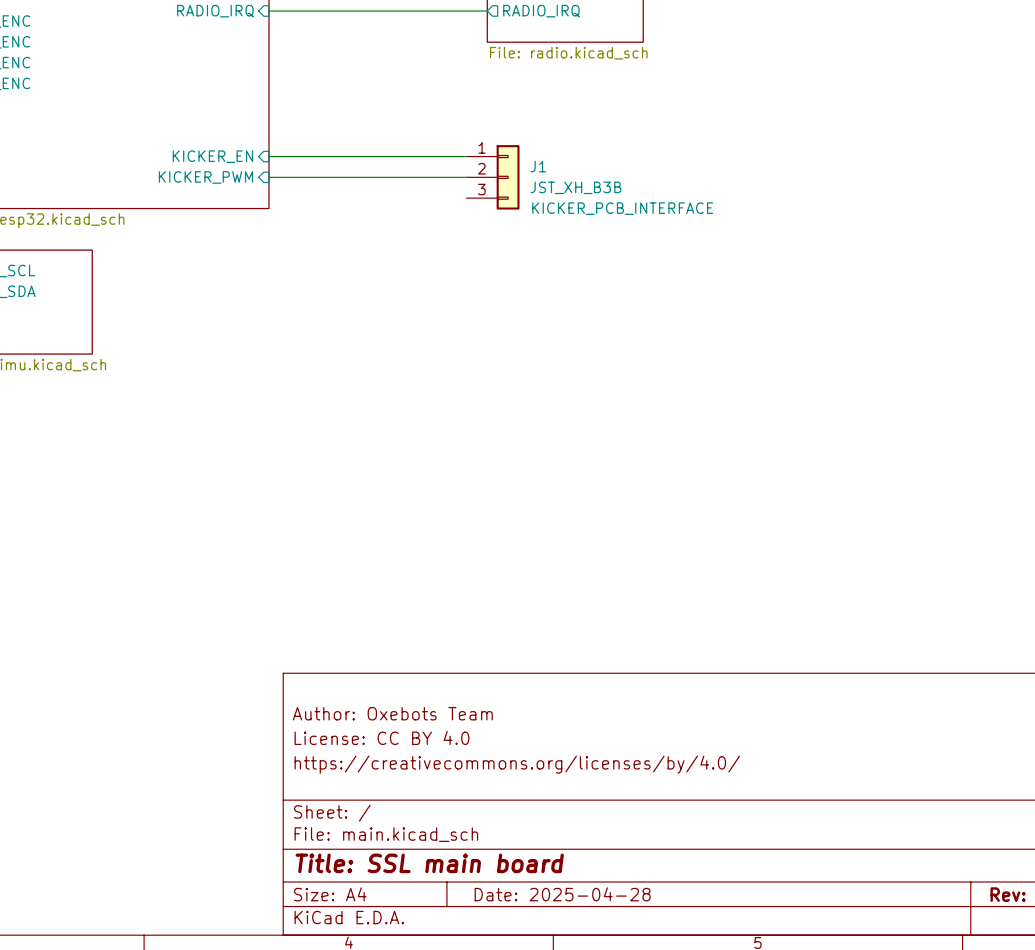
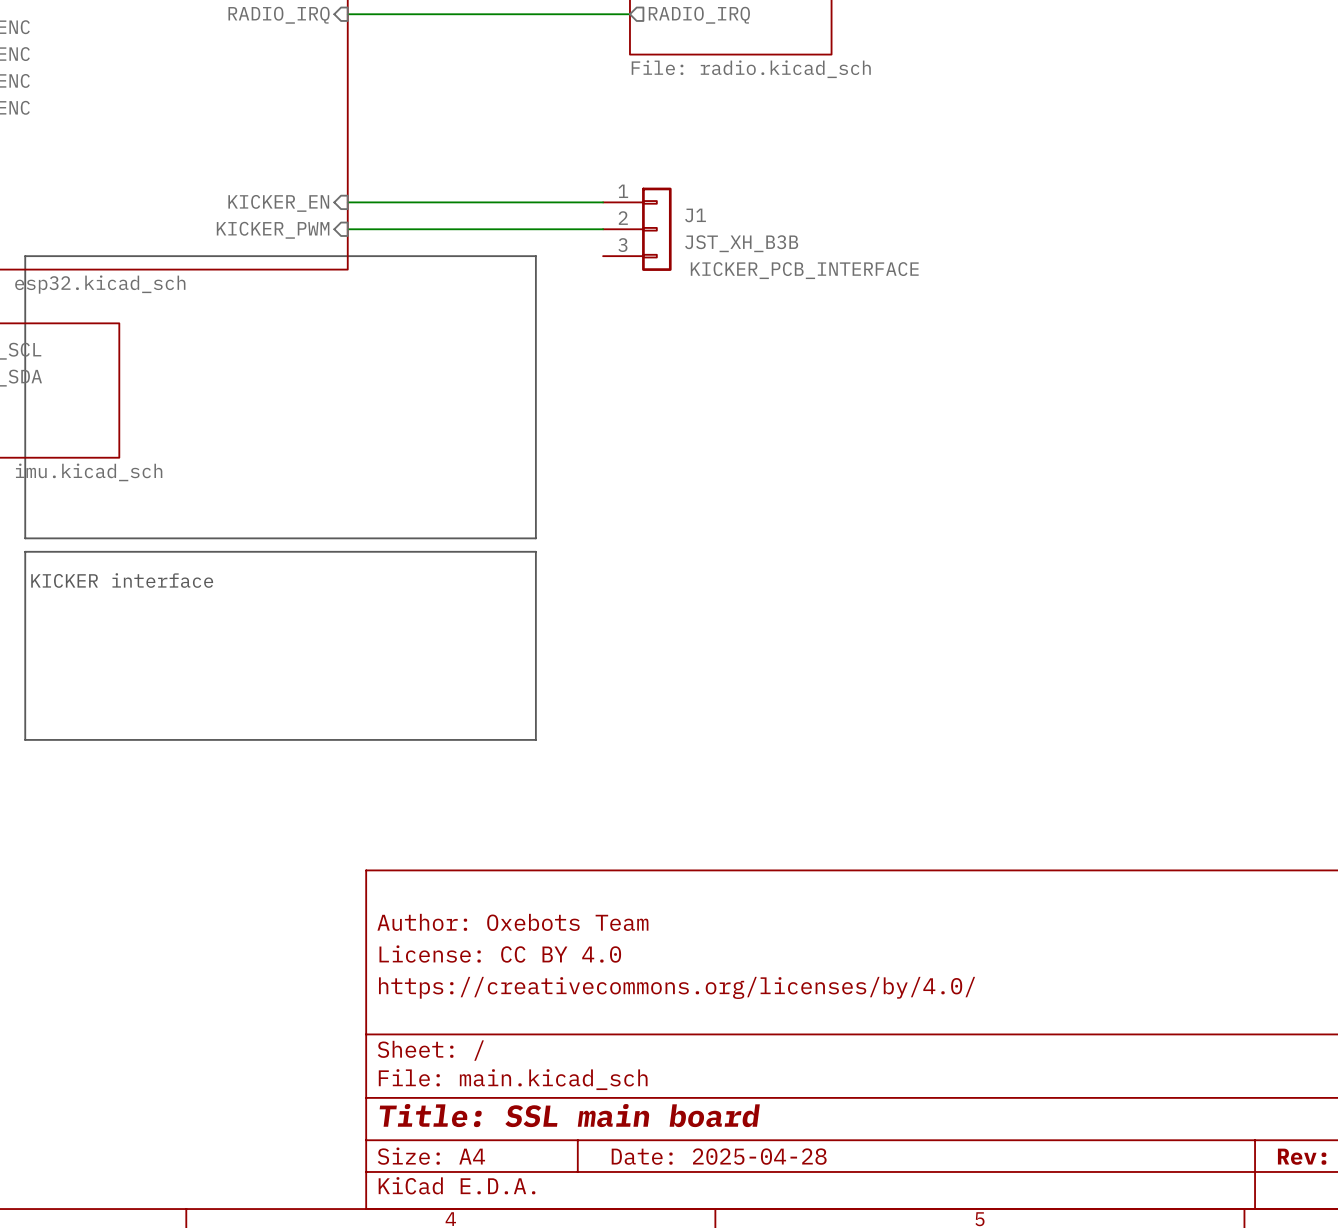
line: none -> (25, 256) (535, 256) (535, 538) (25, 538) (25, 256)
line: none -> (25, 551) (25, 739) (535, 739) (535, 551) (25, 551)
text: none -> KICKER interface (122, 580)

